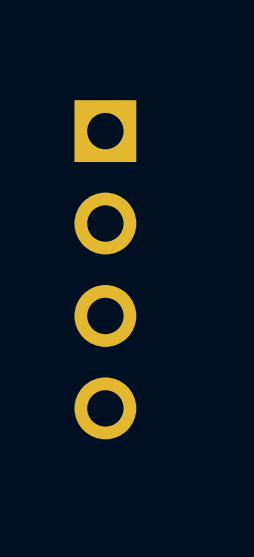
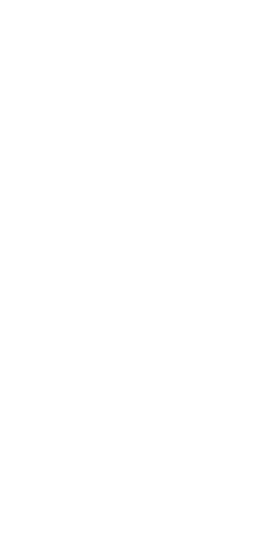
part: (105, 269) -> none

